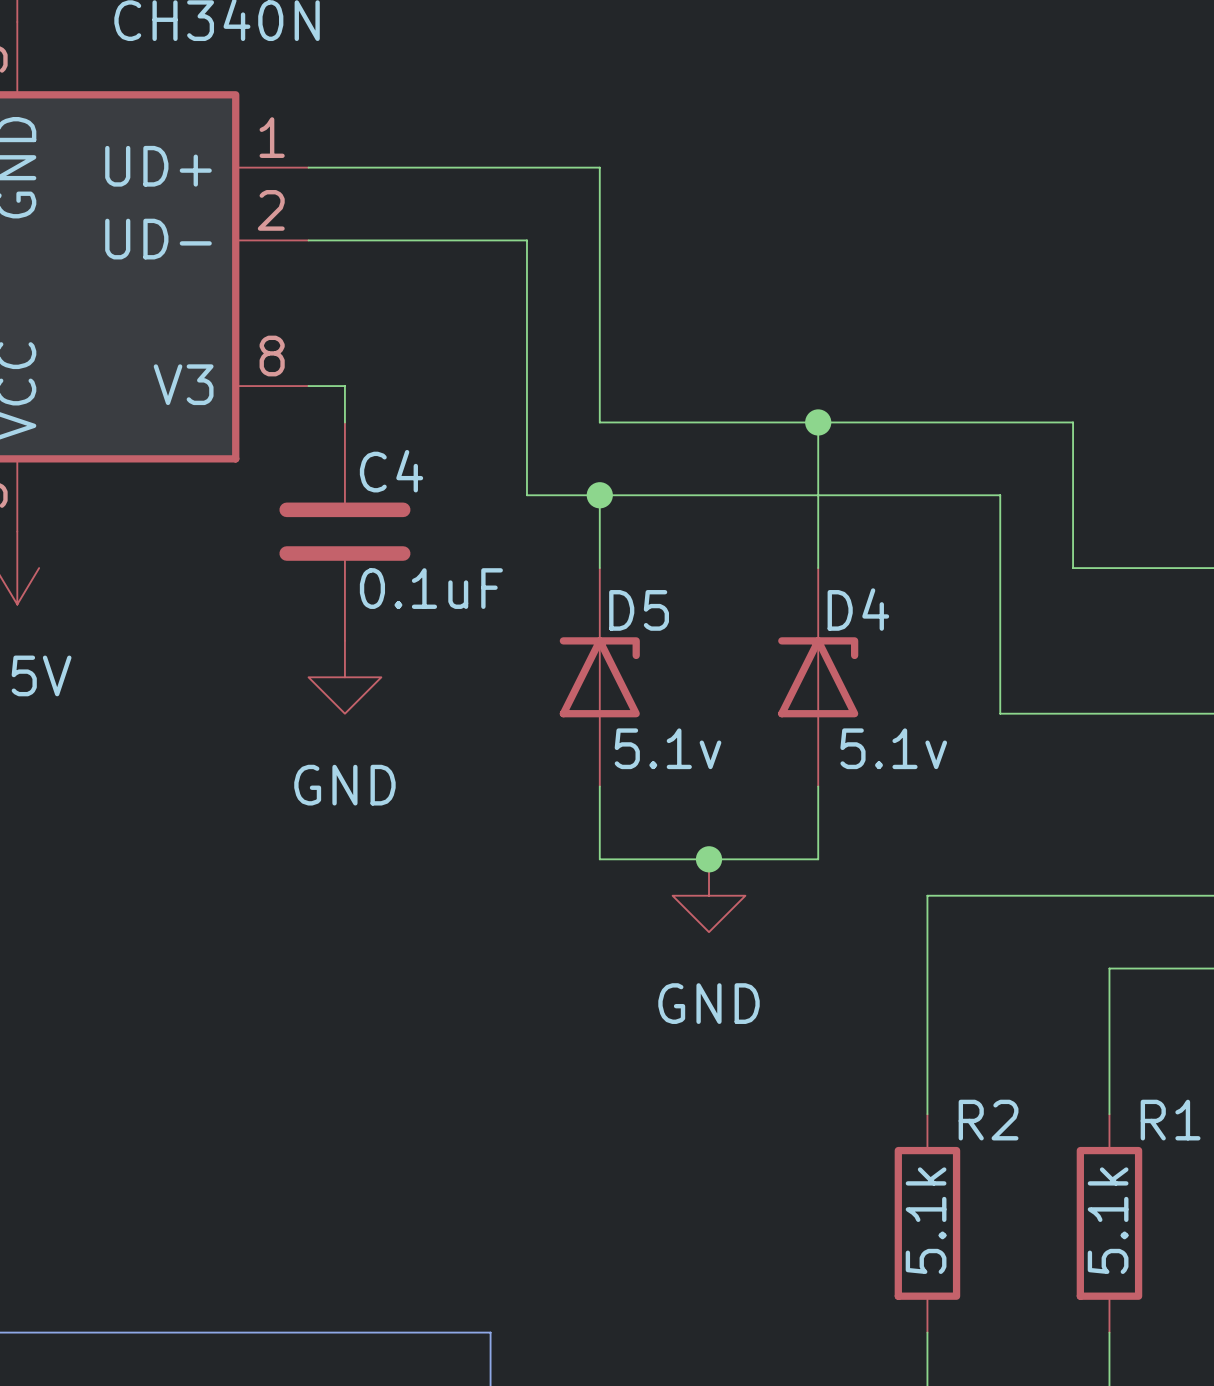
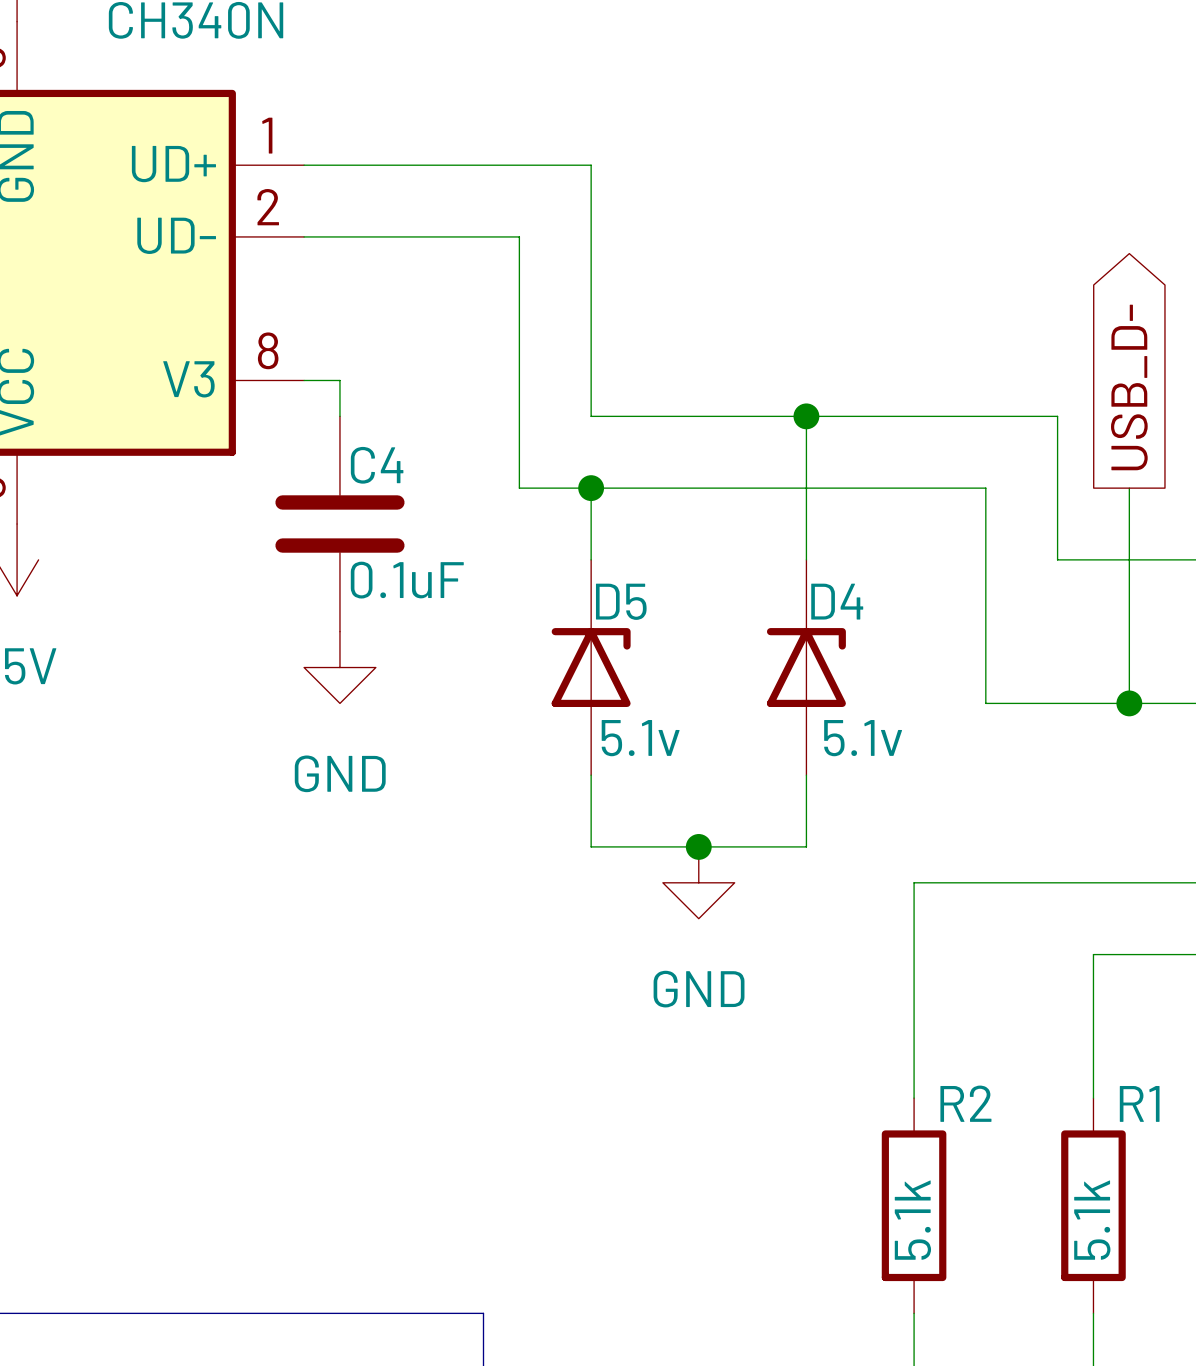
global label: none -> USB_D- (1129, 387)
wire: none -> (1129, 488) (1129, 703)
junction: none -> (1129, 703)

